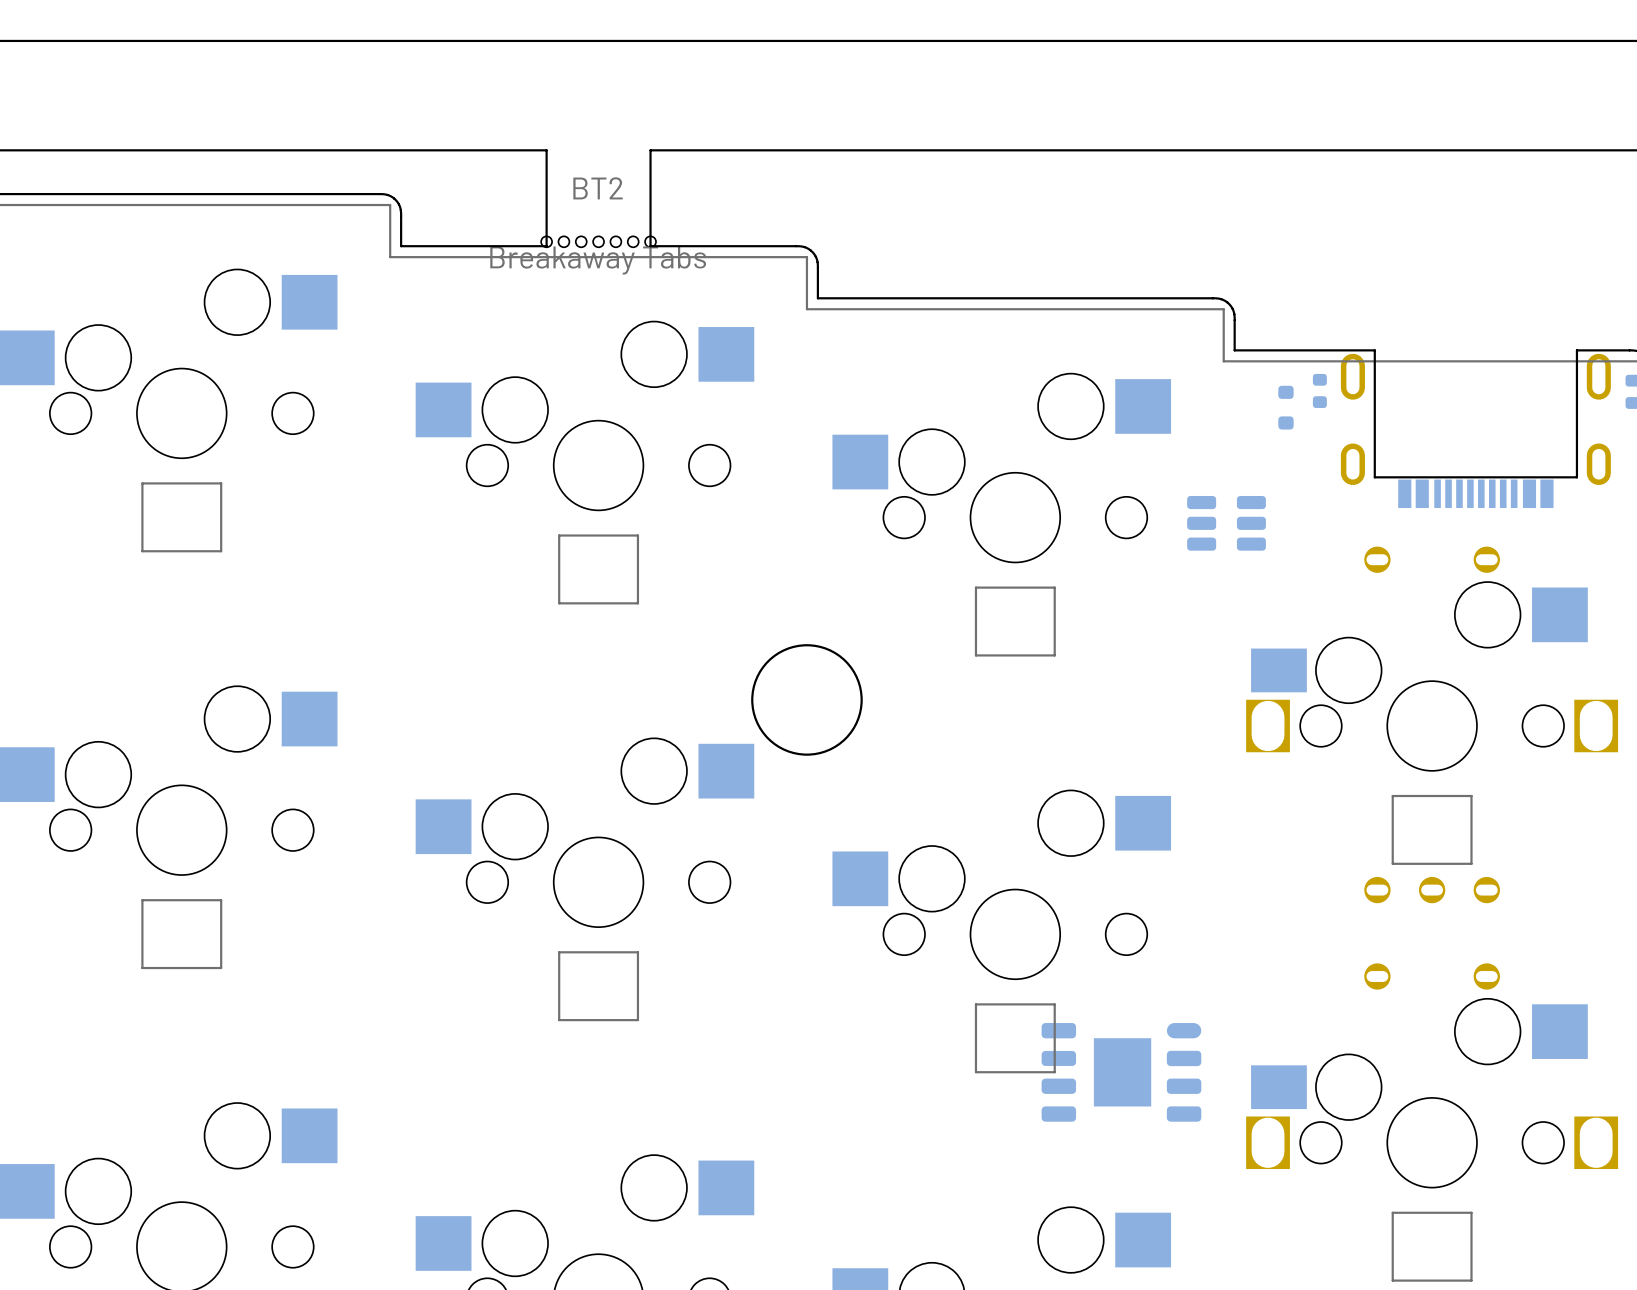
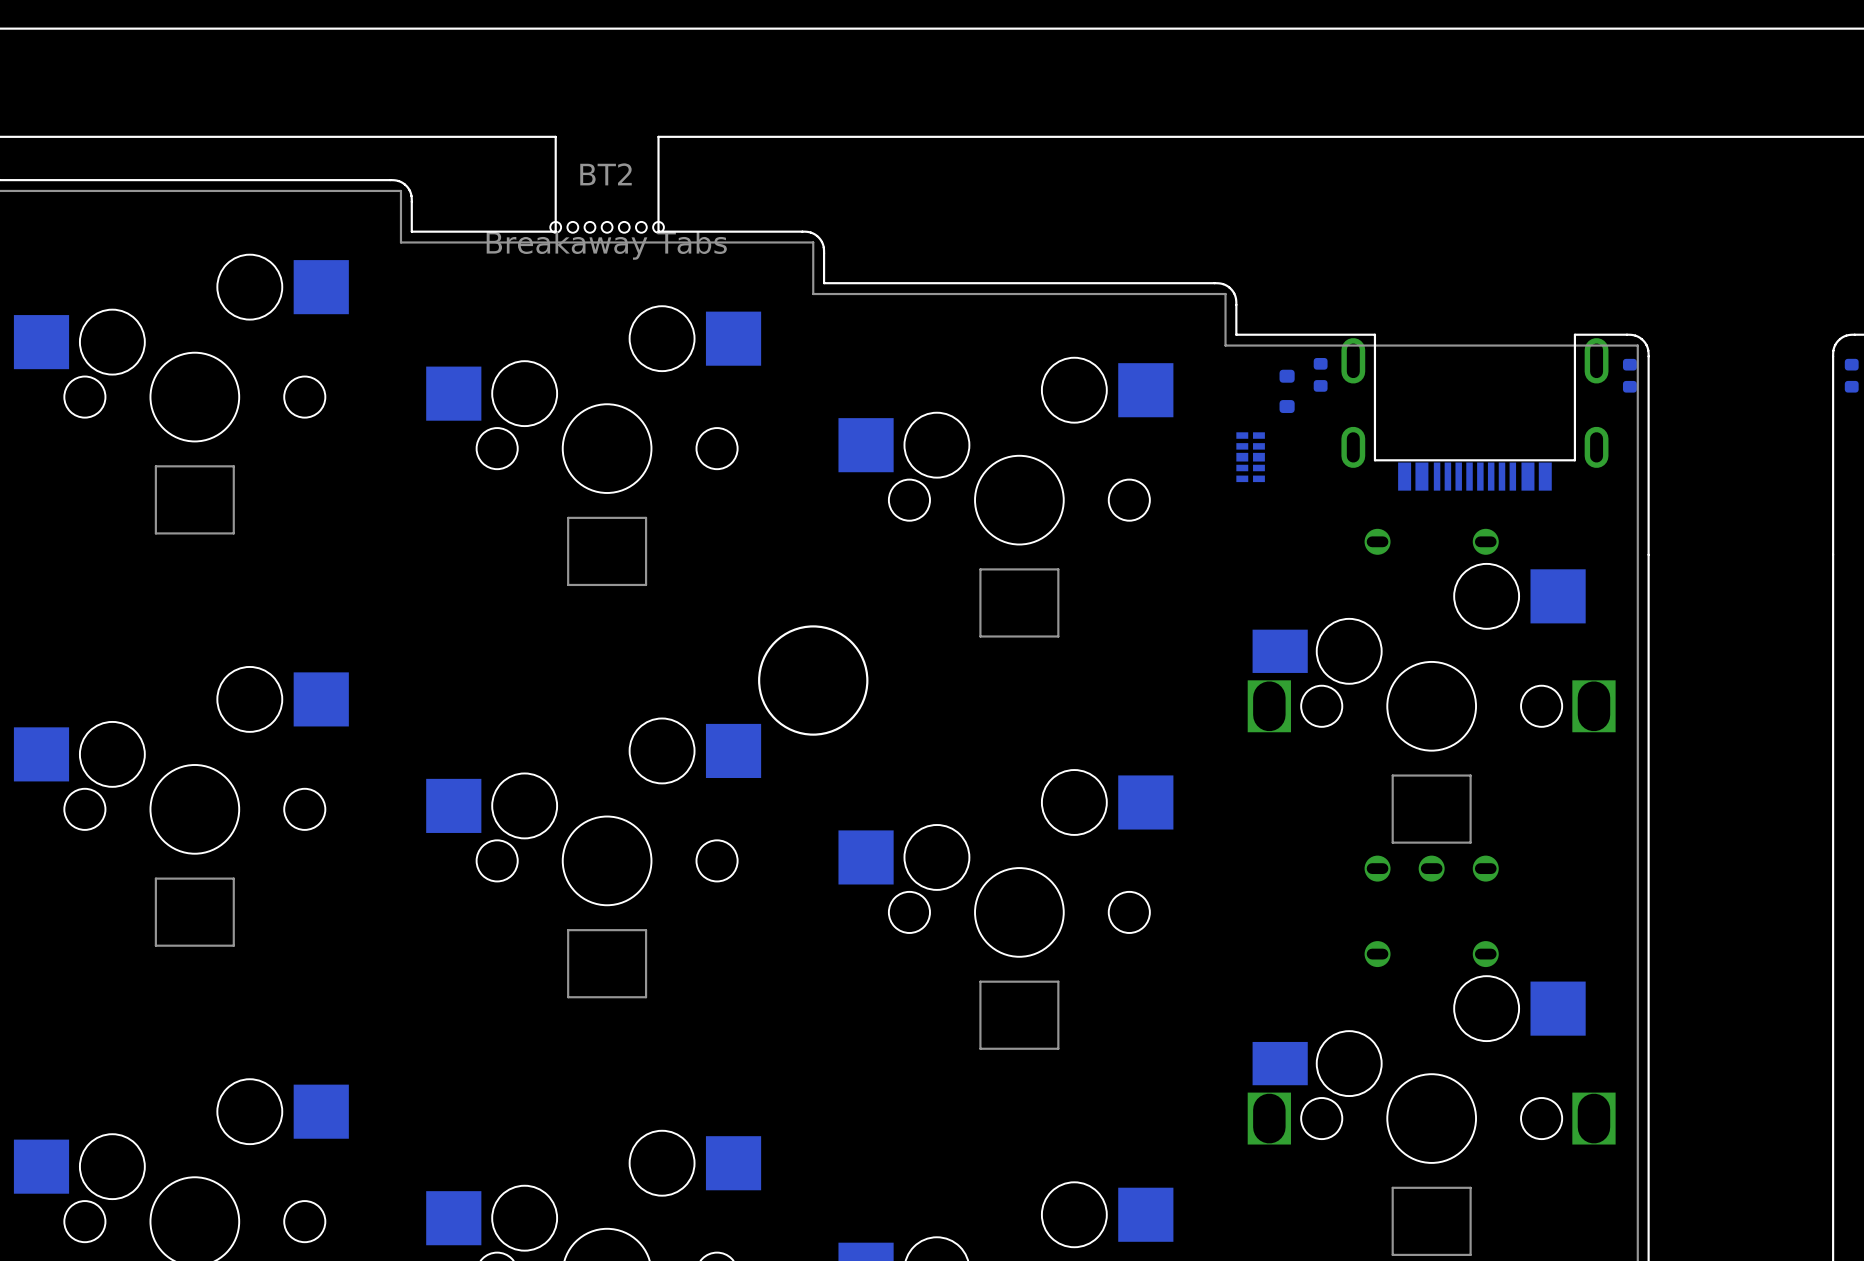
part: none -> (1250, 457)
part: (1226, 523) -> none
part: (1121, 1072) -> none

